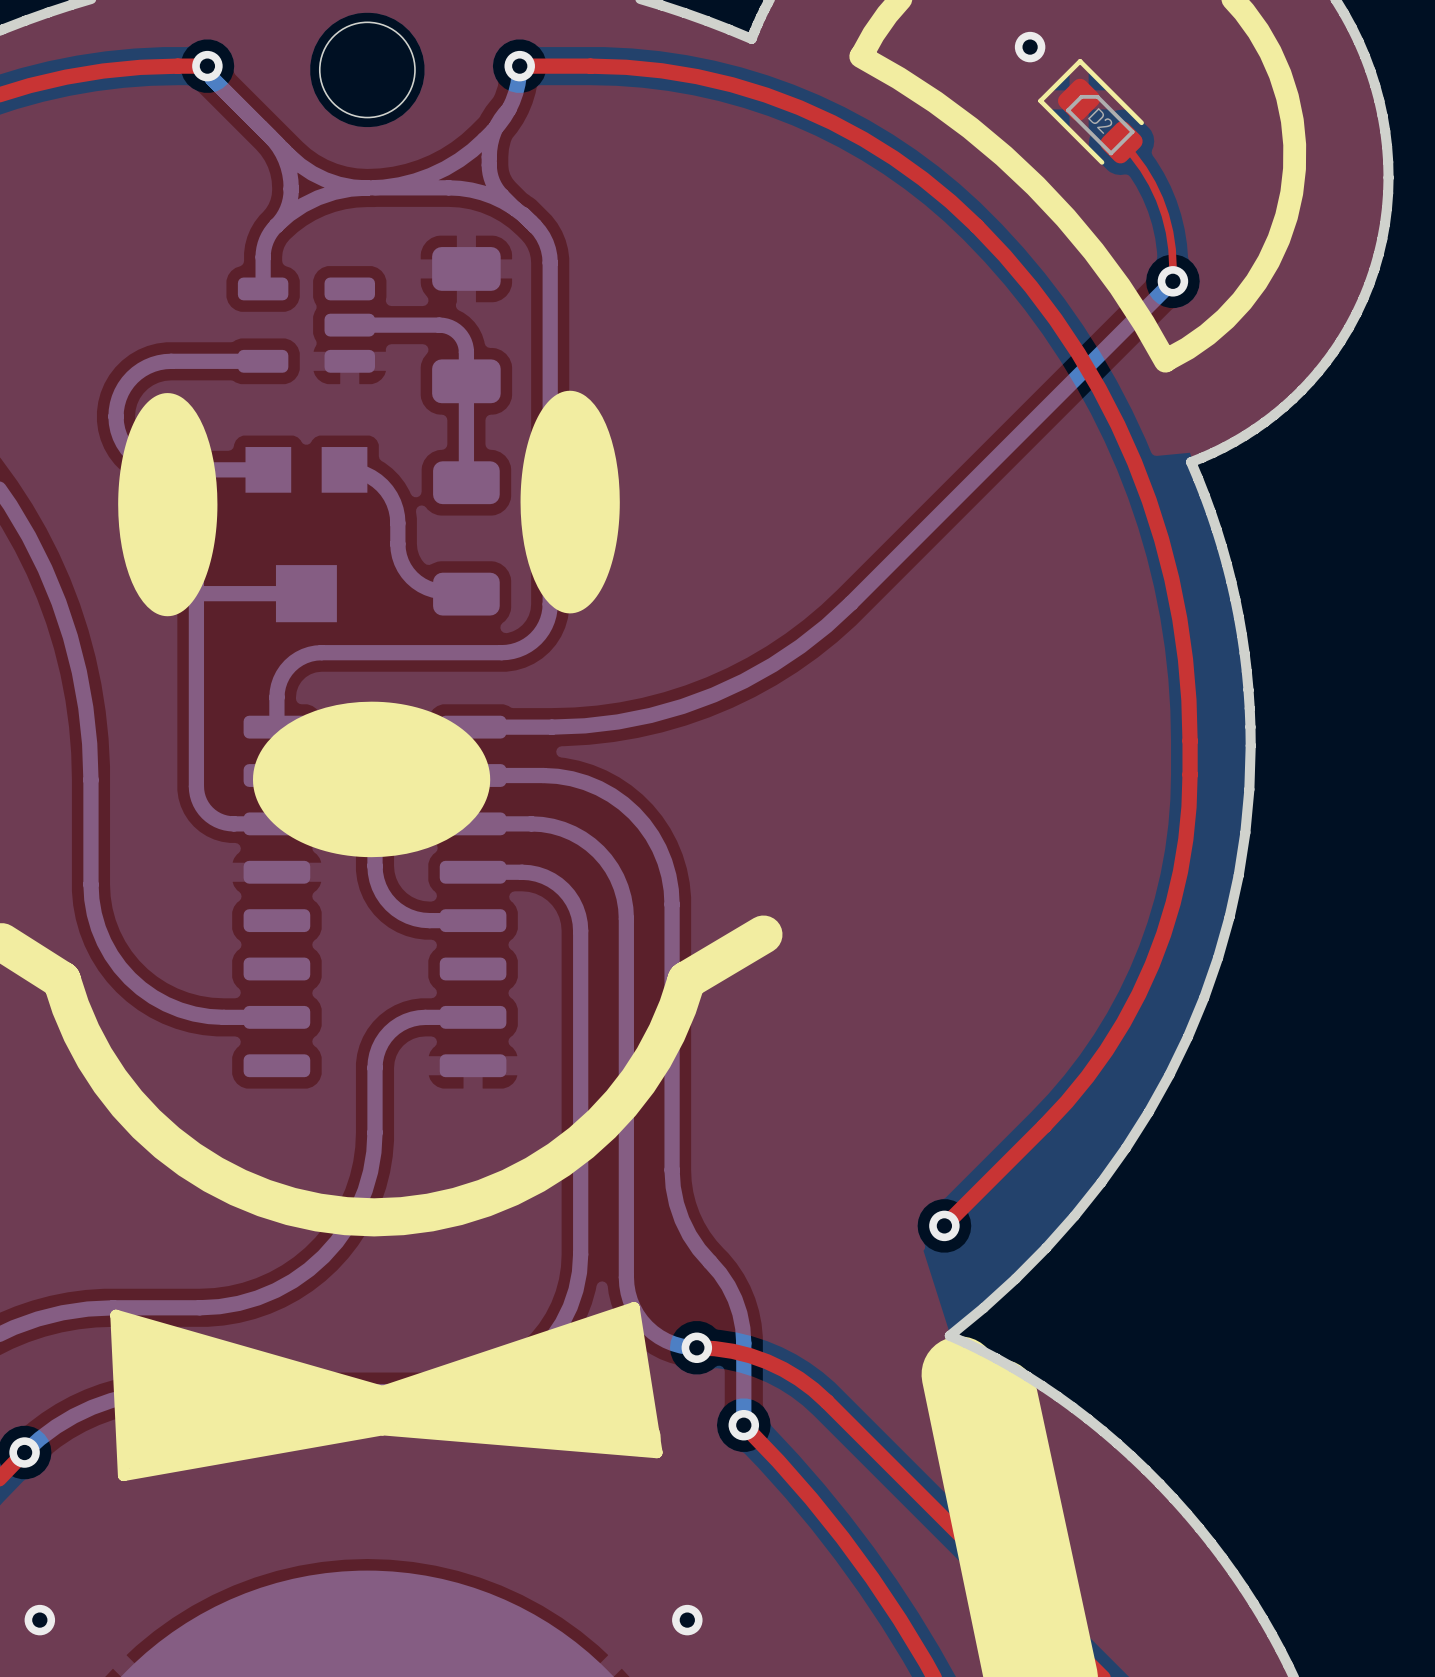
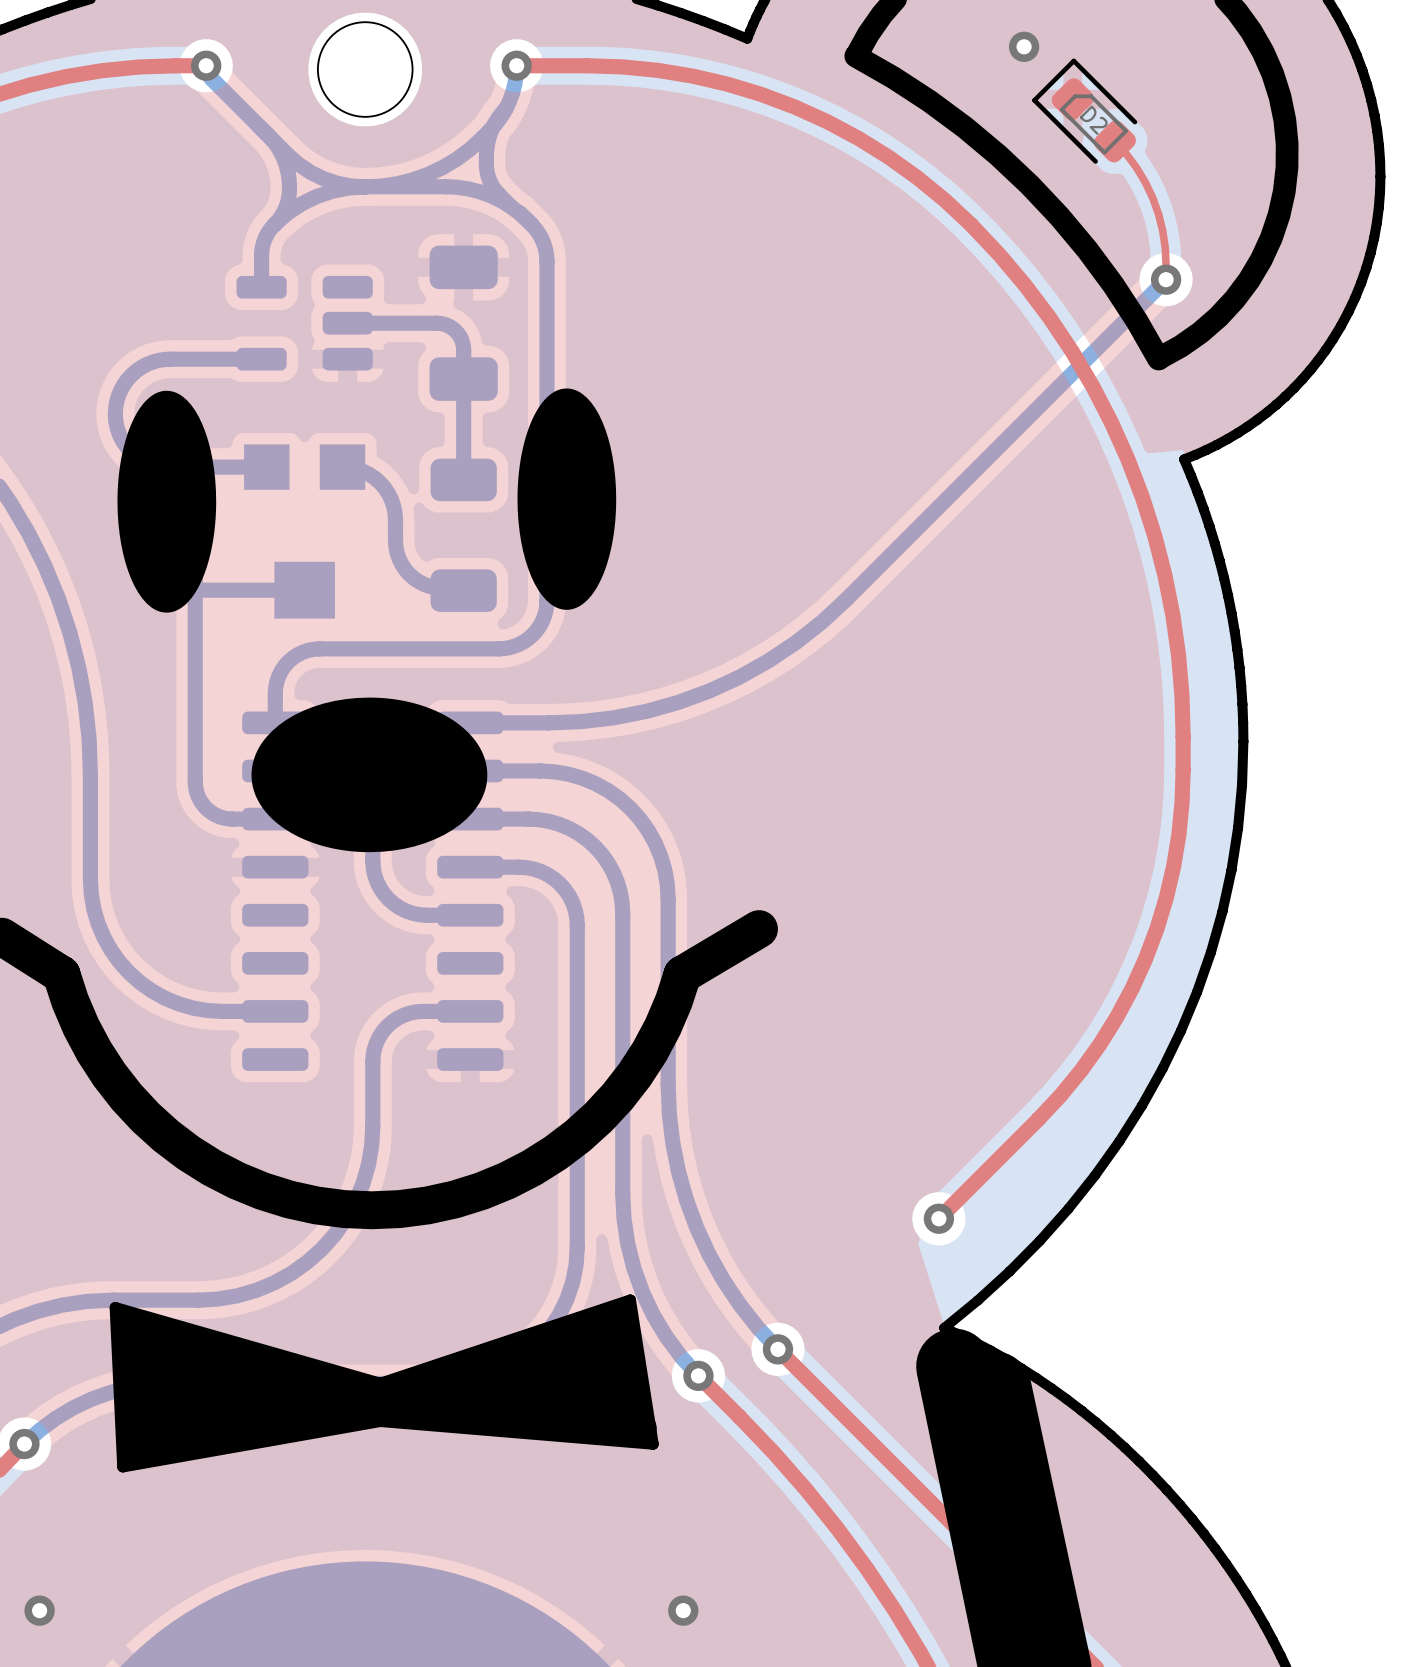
bottom track: (672, 1090) (672, 1170) (676, 1203) (689, 1235) (728, 1285) (739, 1313) (743, 1343) (743, 1425) -> (668, 1084) (669, 1113) (678, 1171) (696, 1227) (709, 1254) (739, 1304) (777, 1349)
bottom track: (626, 1200) (626, 1285) (633, 1307) (641, 1321) (659, 1336) (681, 1346) (696, 1347) -> (622, 1193) (627, 1243) (642, 1292) (666, 1336) (698, 1375)
top track: (696, 1347) (732, 1351) (767, 1361) (799, 1378) (826, 1401) -> (774, 1345) (822, 1393)
via: (696, 1347) -> none
via: none -> (777, 1349)
top track: none -> (698, 1375) (739, 1416)
via: none -> (698, 1375)
via: (743, 1425) -> none

